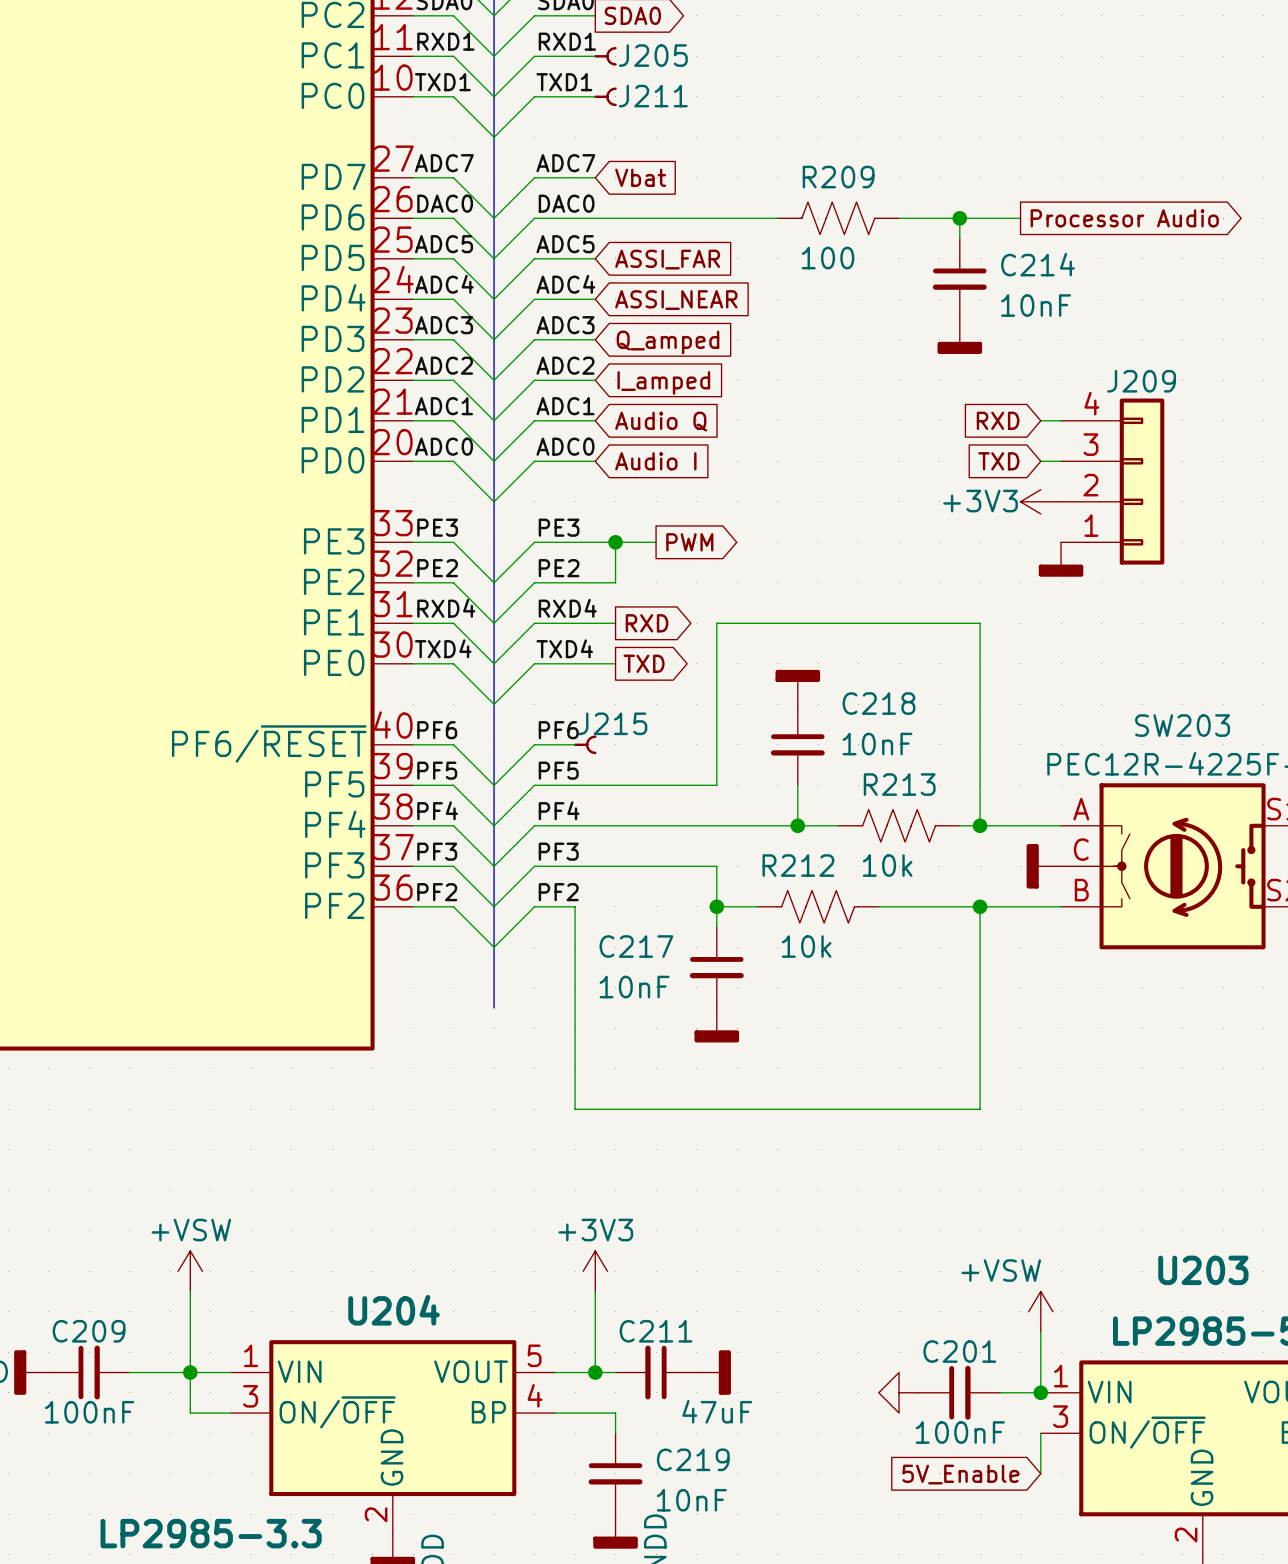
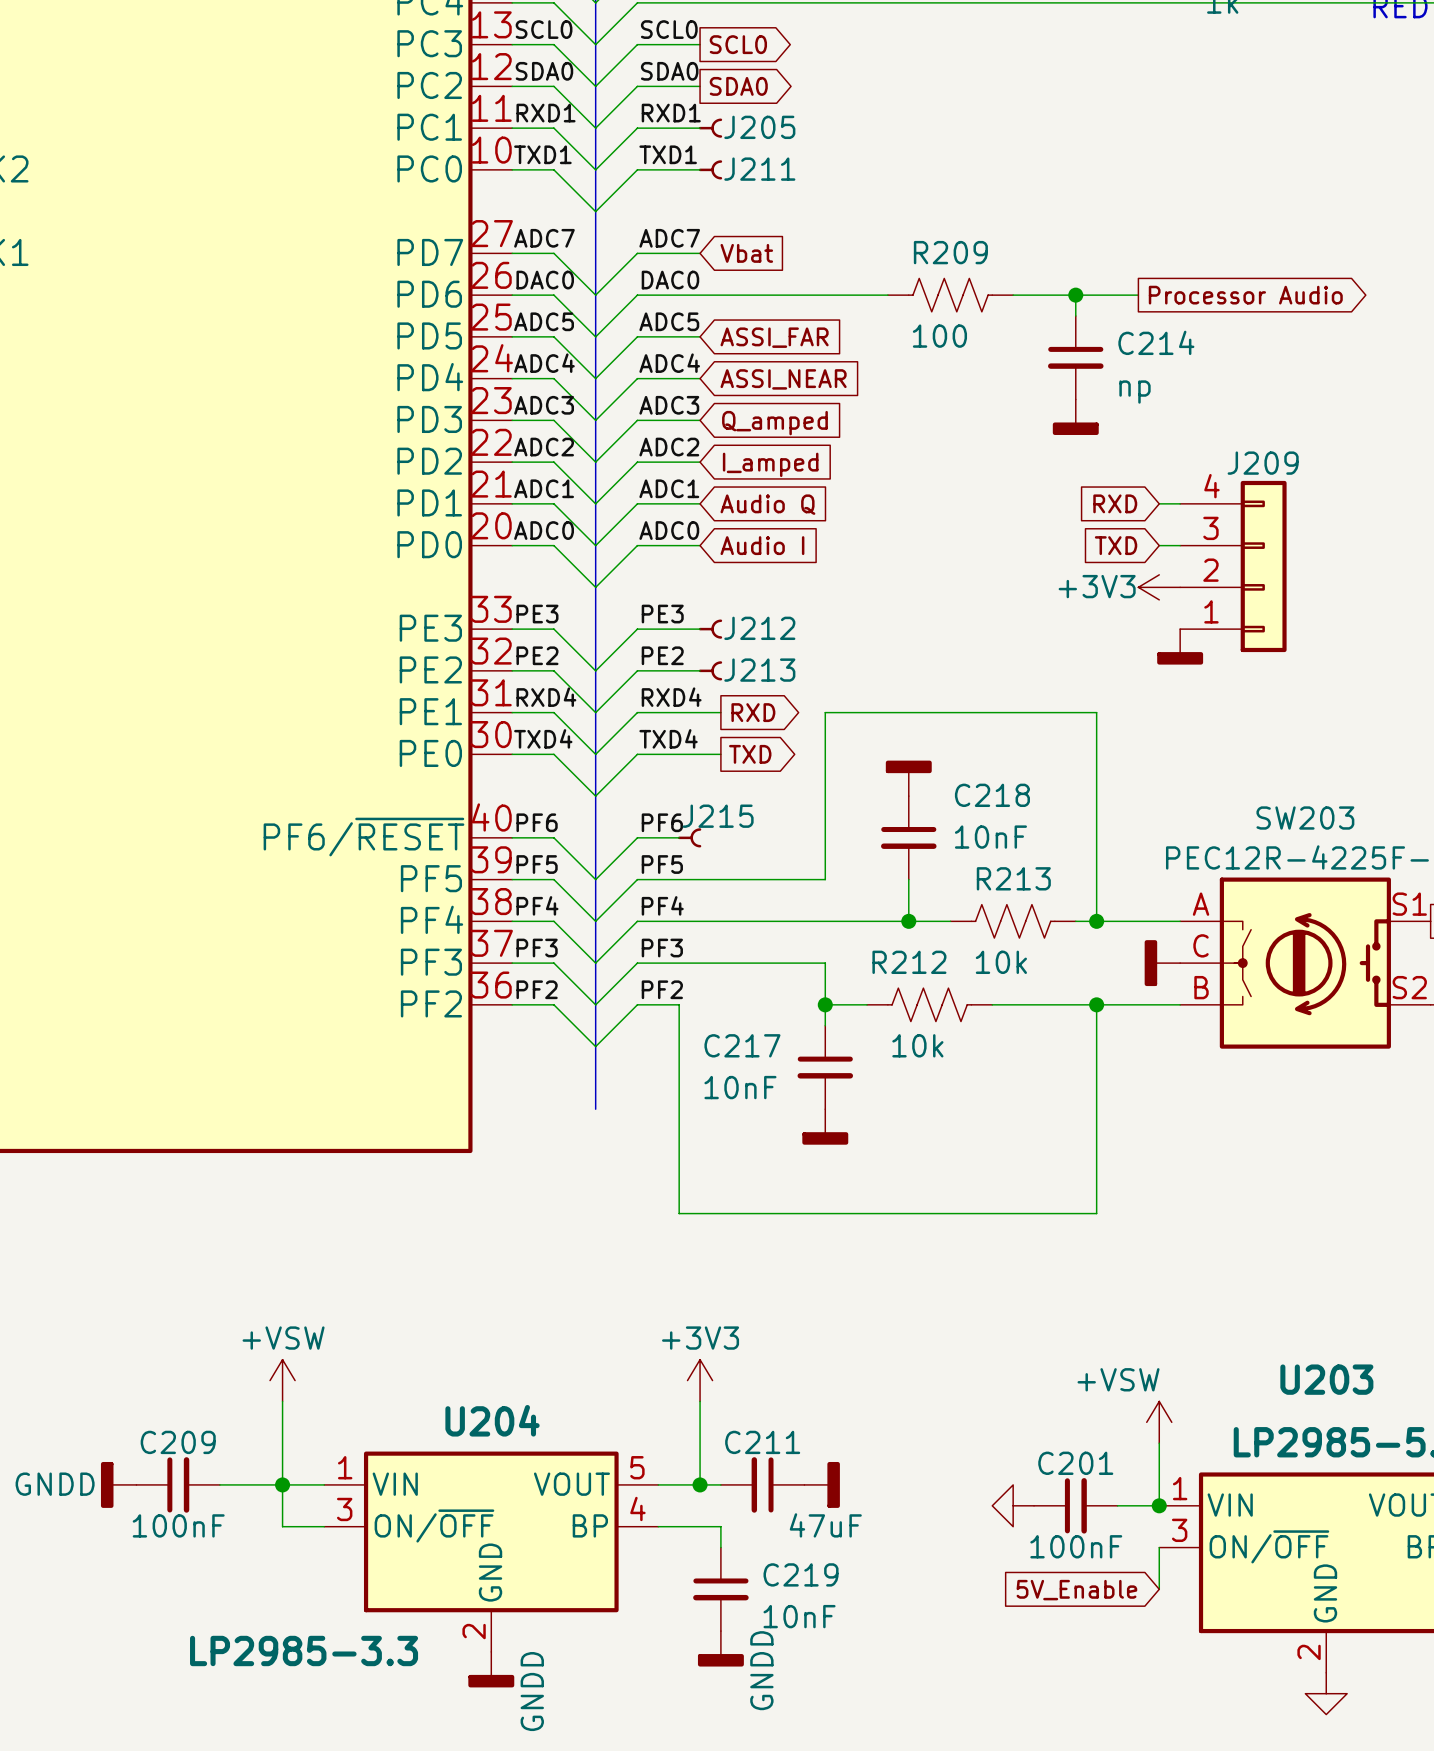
C214 value: 10nF (1036, 305) -> np (1135, 392)
wire: (595, 542) (656, 542) -> none
J212: none -> (710, 629)
wire: (615, 542) (615, 582) (595, 582) -> none
junction: (615, 542) -> none
global label: PWM (689, 542) -> none
J213: none -> (710, 670)

